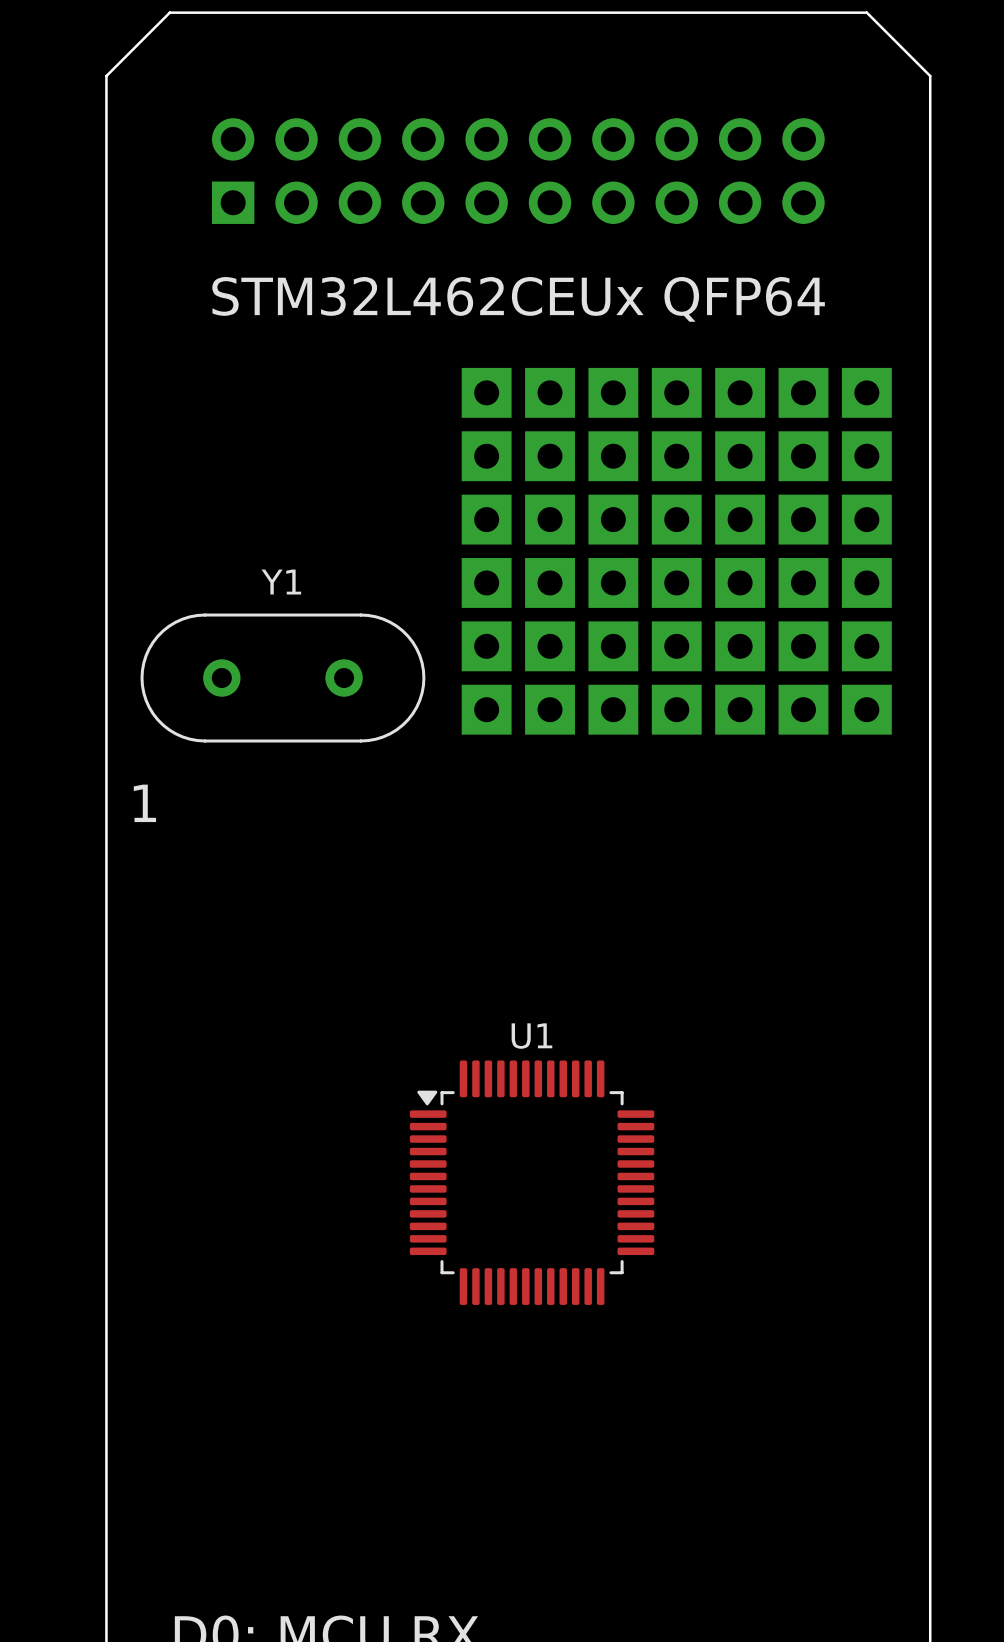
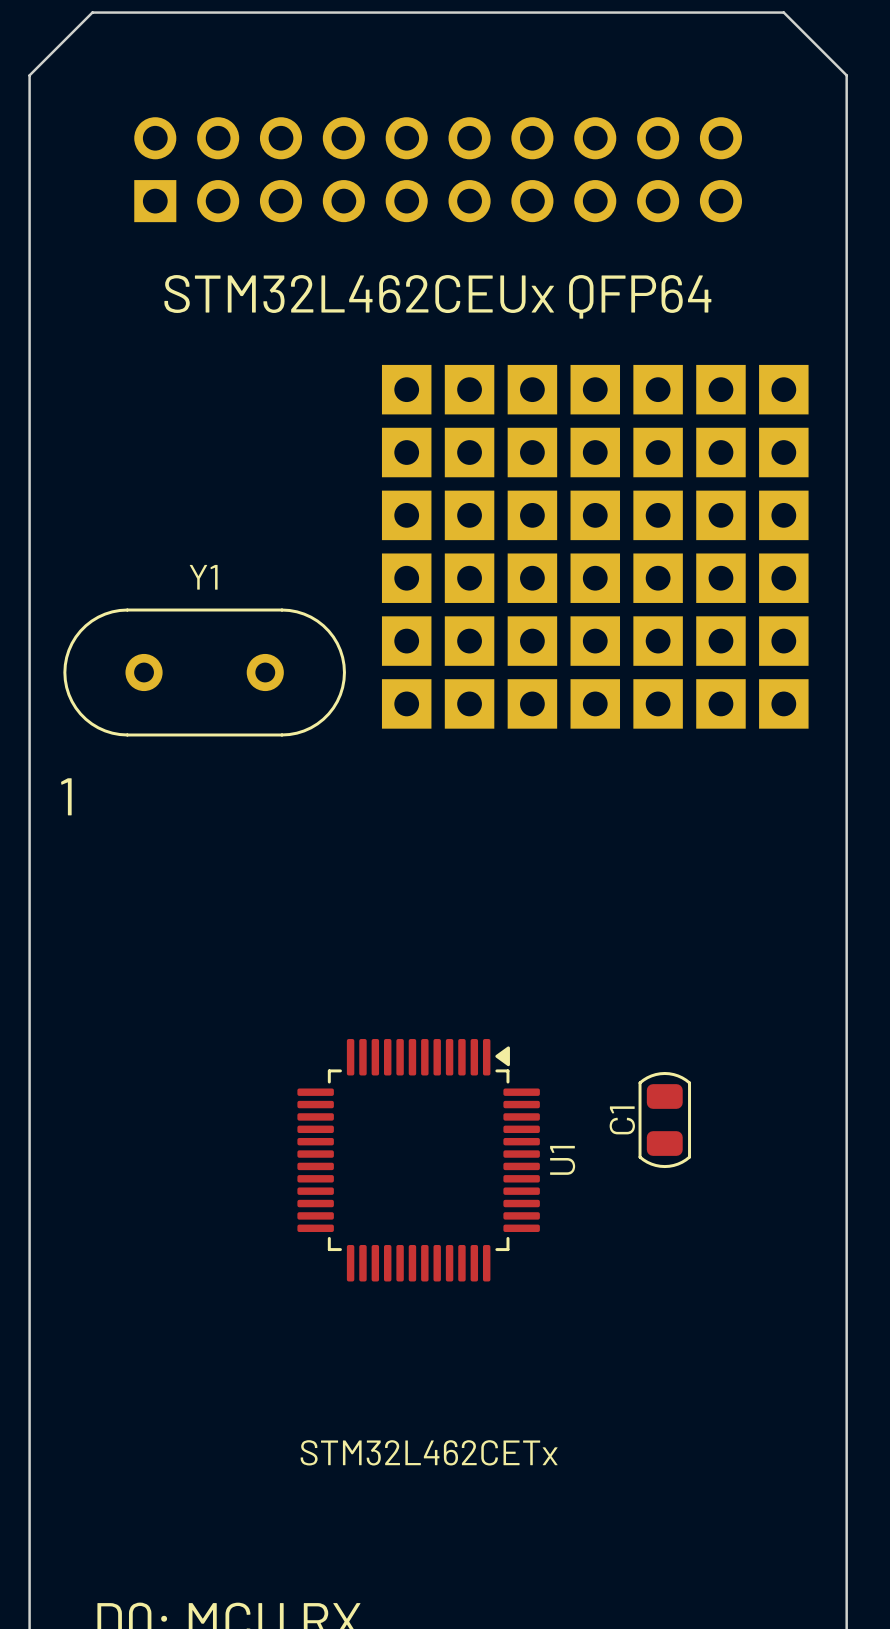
C1: none -> (664, 1120)
U1 rotation: 0° (532, 1182) -> 90° clockwise (418, 1160)
U1 value: none -> STM32L462CETx (429, 1452)

